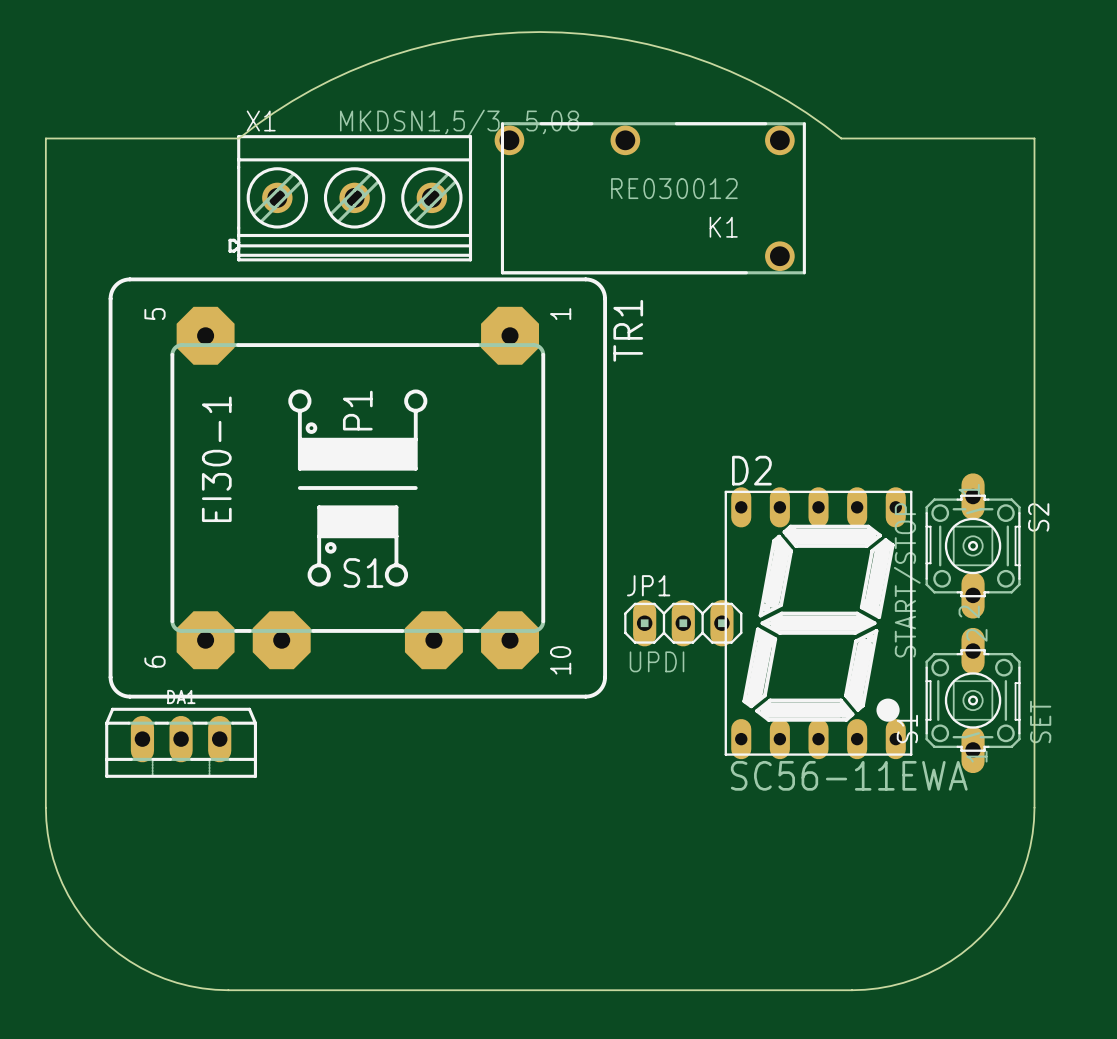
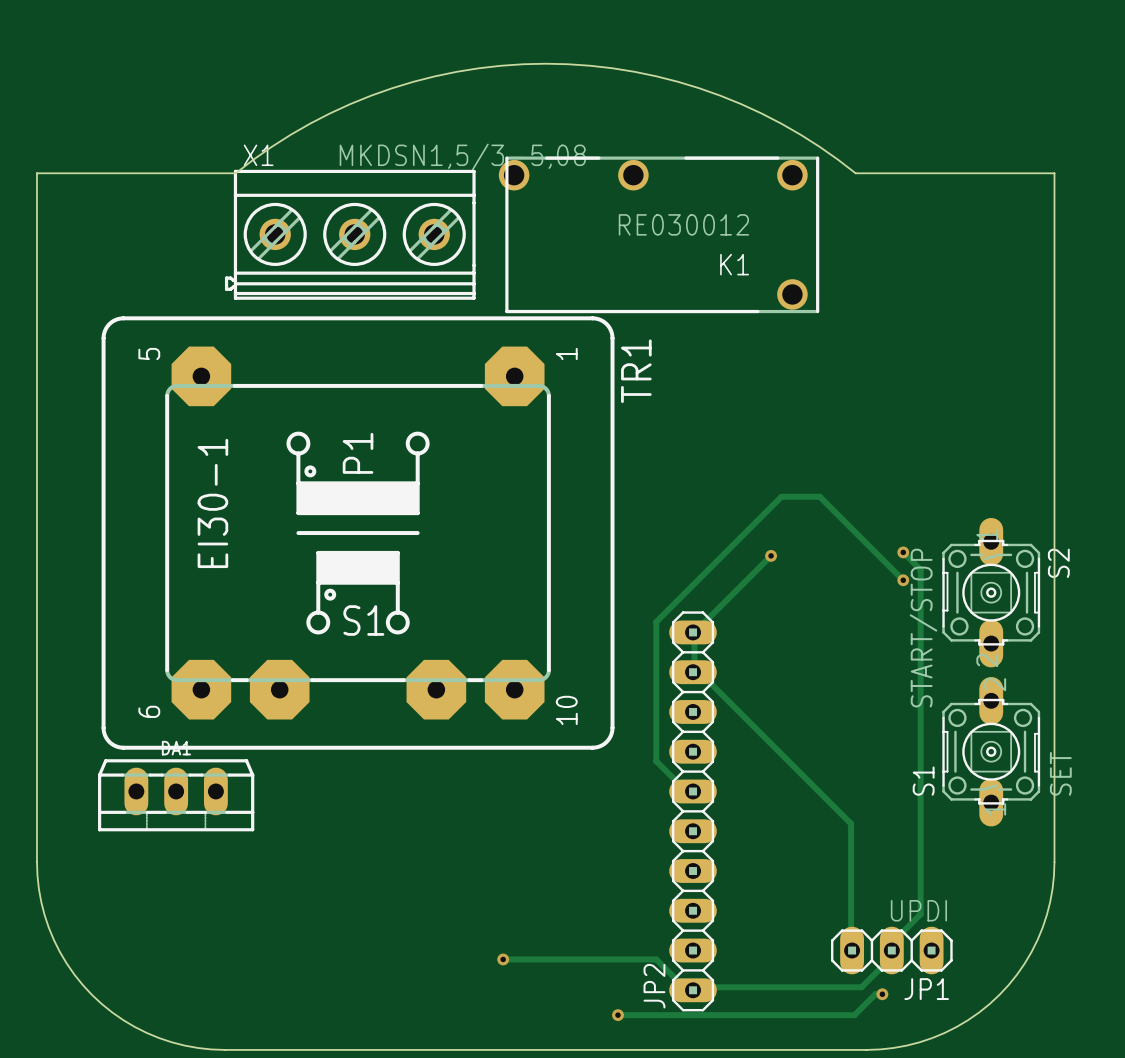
track: none -> (903, 552) (920, 569) (920, 914) (892, 942) (889, 959) (861, 987) (694, 987) (693, 990) (691, 987) (684, 987) (656, 959) (503, 959)
via: none -> (903, 552)
track: none -> (771, 555) (694, 632)
via: none -> (771, 555)
track: none -> (903, 580) (819, 496) (781, 496) (656, 621) (656, 761) (684, 788) (691, 788) (693, 791)
via: none -> (903, 580)
track: none -> (694, 632) (693, 672) (694, 667) (851, 823) (852, 950)
JP1 name position: JP1 (648, 585) -> JP1 (926, 989)
JP1 position: (683, 623) -> (891, 950)
D2: SC56-11EWA (818, 623) -> none
JP1 value position: UPDI (657, 661) -> UPDI (918, 910)
JP2: none -> (693, 811)
via: none -> (503, 959)
track: none -> (882, 994) (875, 994) (854, 1015) (617, 1015)
via: none -> (882, 994)
via: none -> (617, 1015)

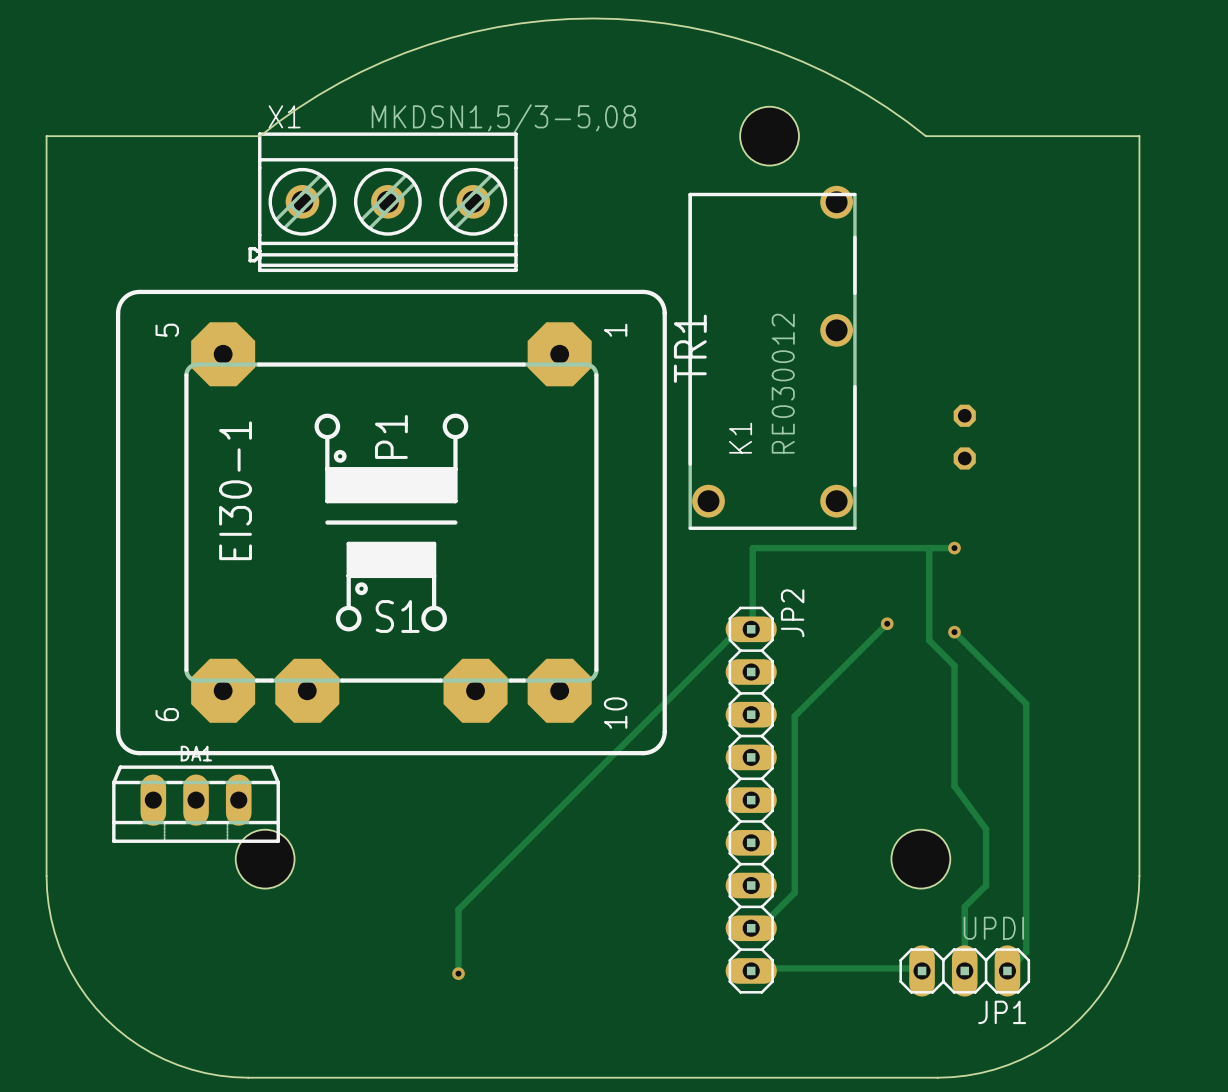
hole: none -> (769, 136)
K1 rotation: 0° (659, 234) -> 90° clockwise (772, 357)
part: none -> (964, 437)
track: (903, 552) (920, 569) (920, 914) (892, 942) (889, 959) (861, 987) (694, 987) (693, 990) (691, 987) (684, 987) (656, 959) (503, 959) -> none
via: (903, 552) -> none
track: (771, 555) (694, 632) (693, 672) (694, 667) (851, 823) (852, 950) -> (751, 970) (752, 968) (920, 968) (922, 970)
via: (771, 555) -> none
track: none -> (929, 548) (929, 640) (954, 665) (954, 786) (986, 829) (986, 885) (964, 906) (964, 970)
track: none -> (954, 548) (752, 548) (751, 629) (738, 629) (458, 909) (458, 973)
via: none -> (954, 548)
track: (903, 580) (819, 496) (781, 496) (656, 621) (656, 761) (684, 788) (691, 788) (693, 791) -> none
via: (903, 580) -> none
S2: START/STOP (991, 592) -> none
JP2 footprint: [669, 611, 717, 1012] -> [725, 606, 777, 994]
track: none -> (887, 623) (794, 716) (794, 892) (752, 934) (751, 928)
via: none -> (887, 623)
track: none -> (954, 632) (1026, 703) (1026, 952) (1007, 970)
via: none -> (954, 632)
S1: SET (991, 751) -> none
hole: none -> (265, 859)
hole: none -> (920, 859)
via position: (503, 959) -> (458, 973)
JP2 name position: JP2 (654, 986) -> JP2 (792, 613)
track: (882, 994) (875, 994) (854, 1015) (617, 1015) -> none
via: (882, 994) -> none
via: (617, 1015) -> none

